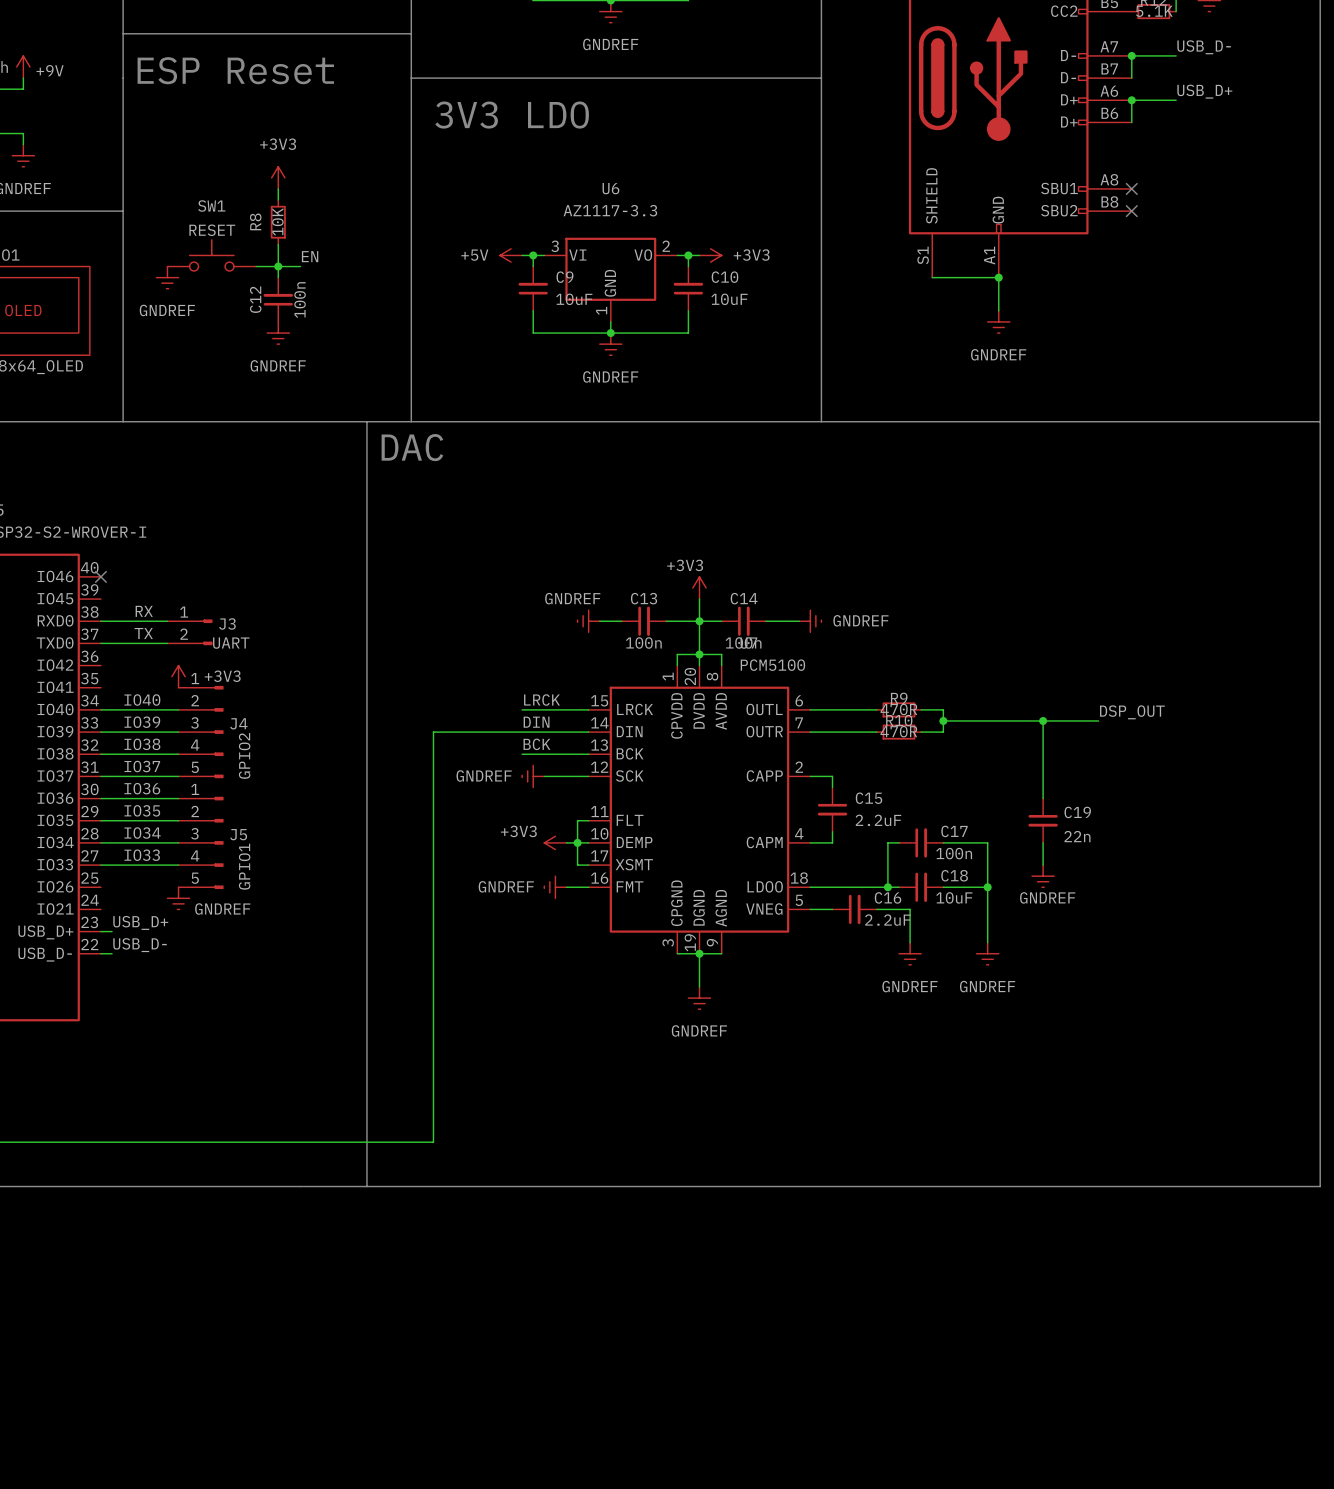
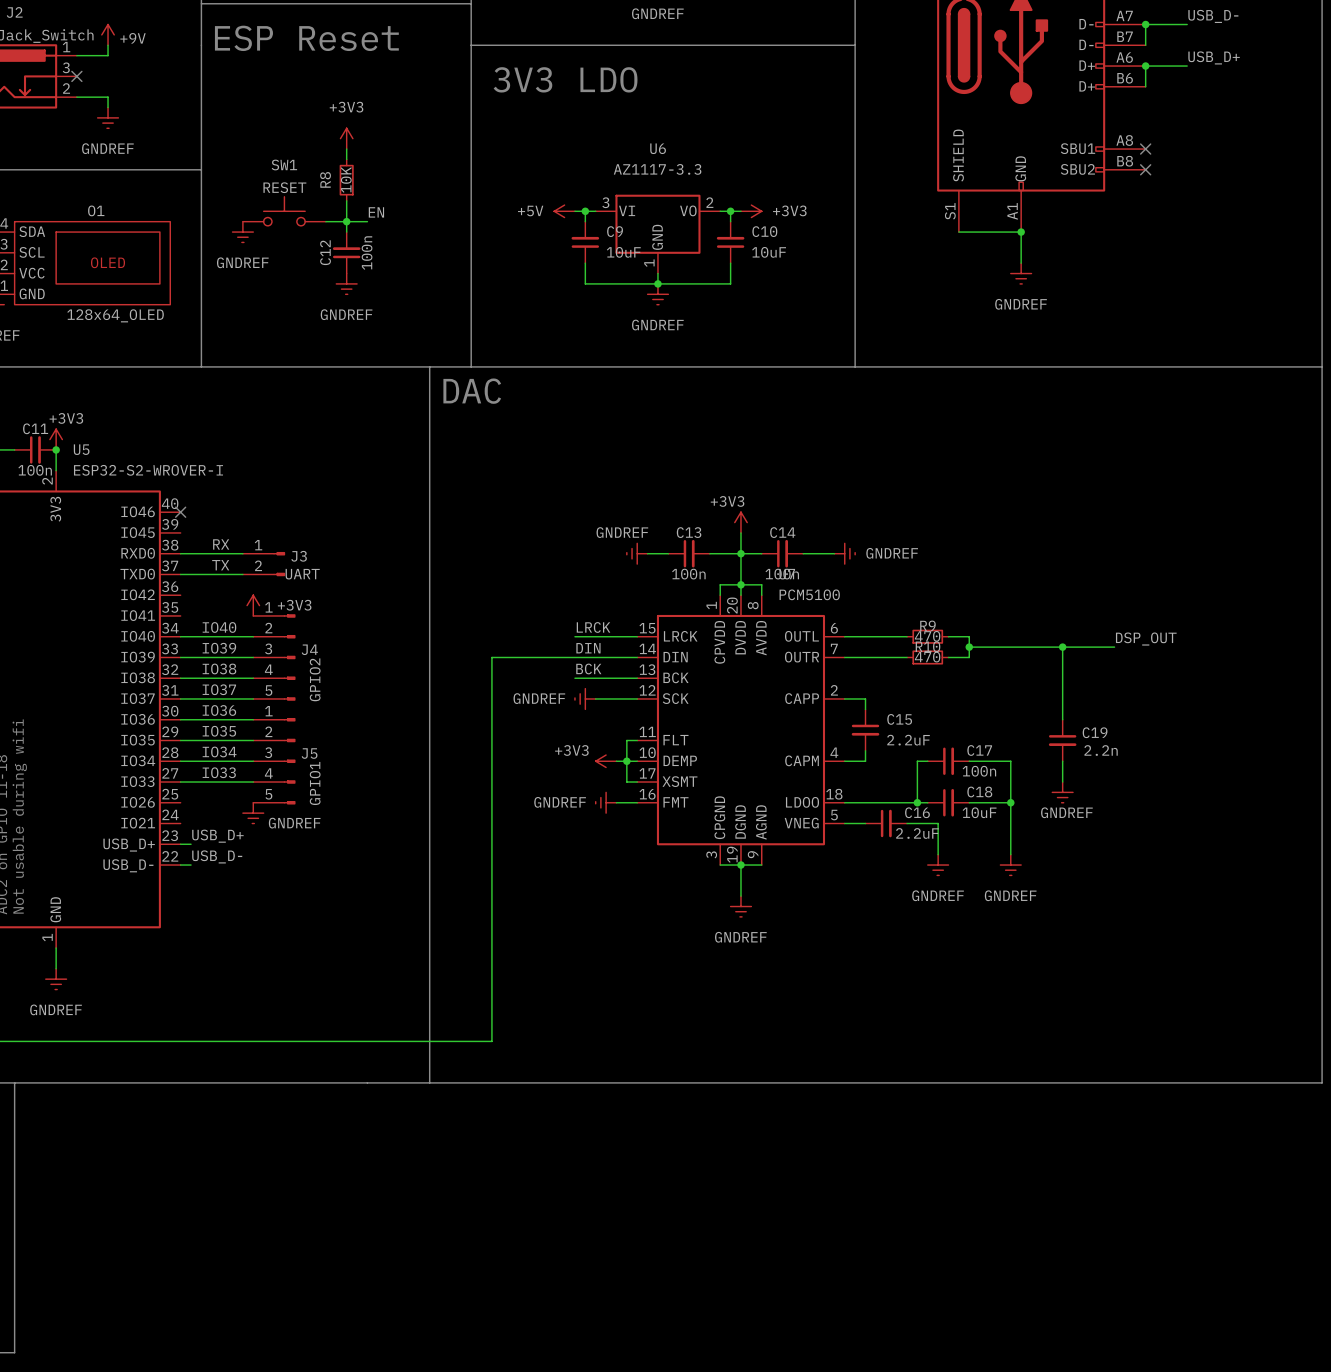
R9 value: 470R (898, 709) -> 470 (927, 636)
R10 value: 470R (898, 731) -> 470 (927, 657)
C19 value: 22n (1077, 836) -> 2.2n (1101, 750)

